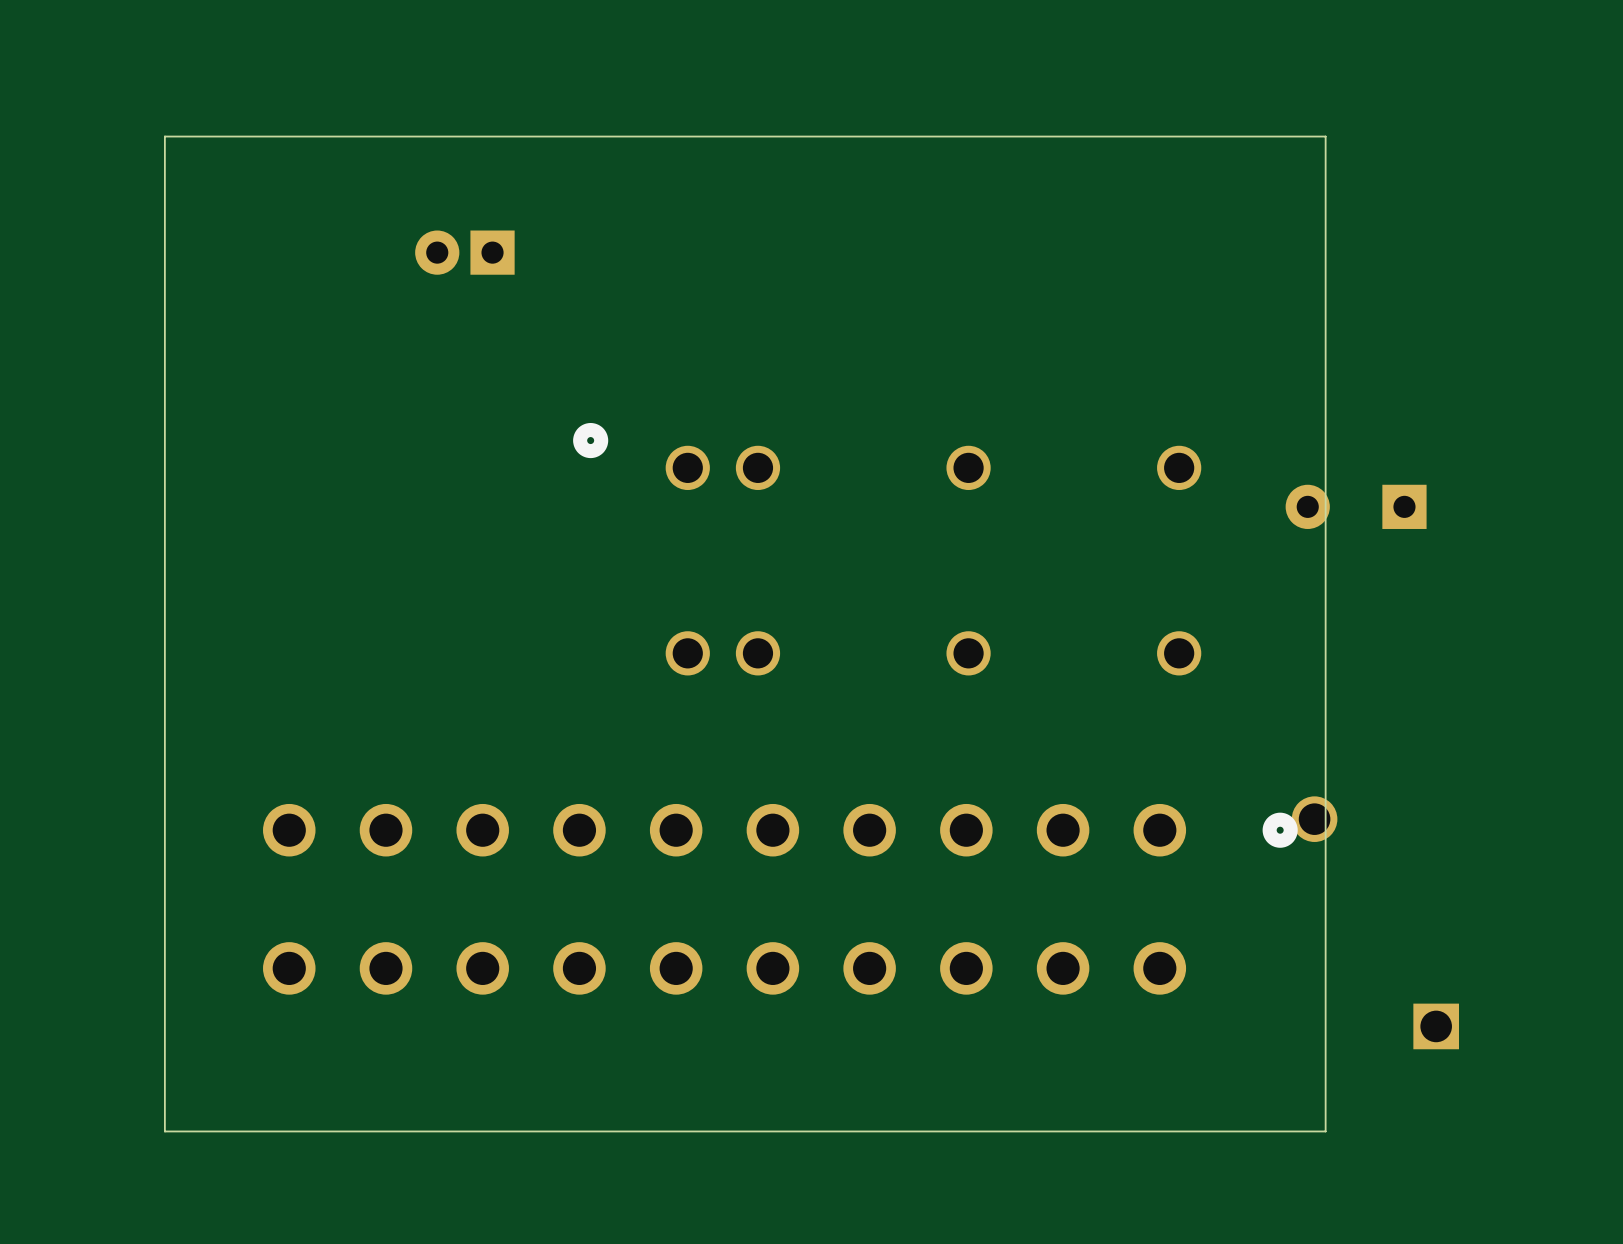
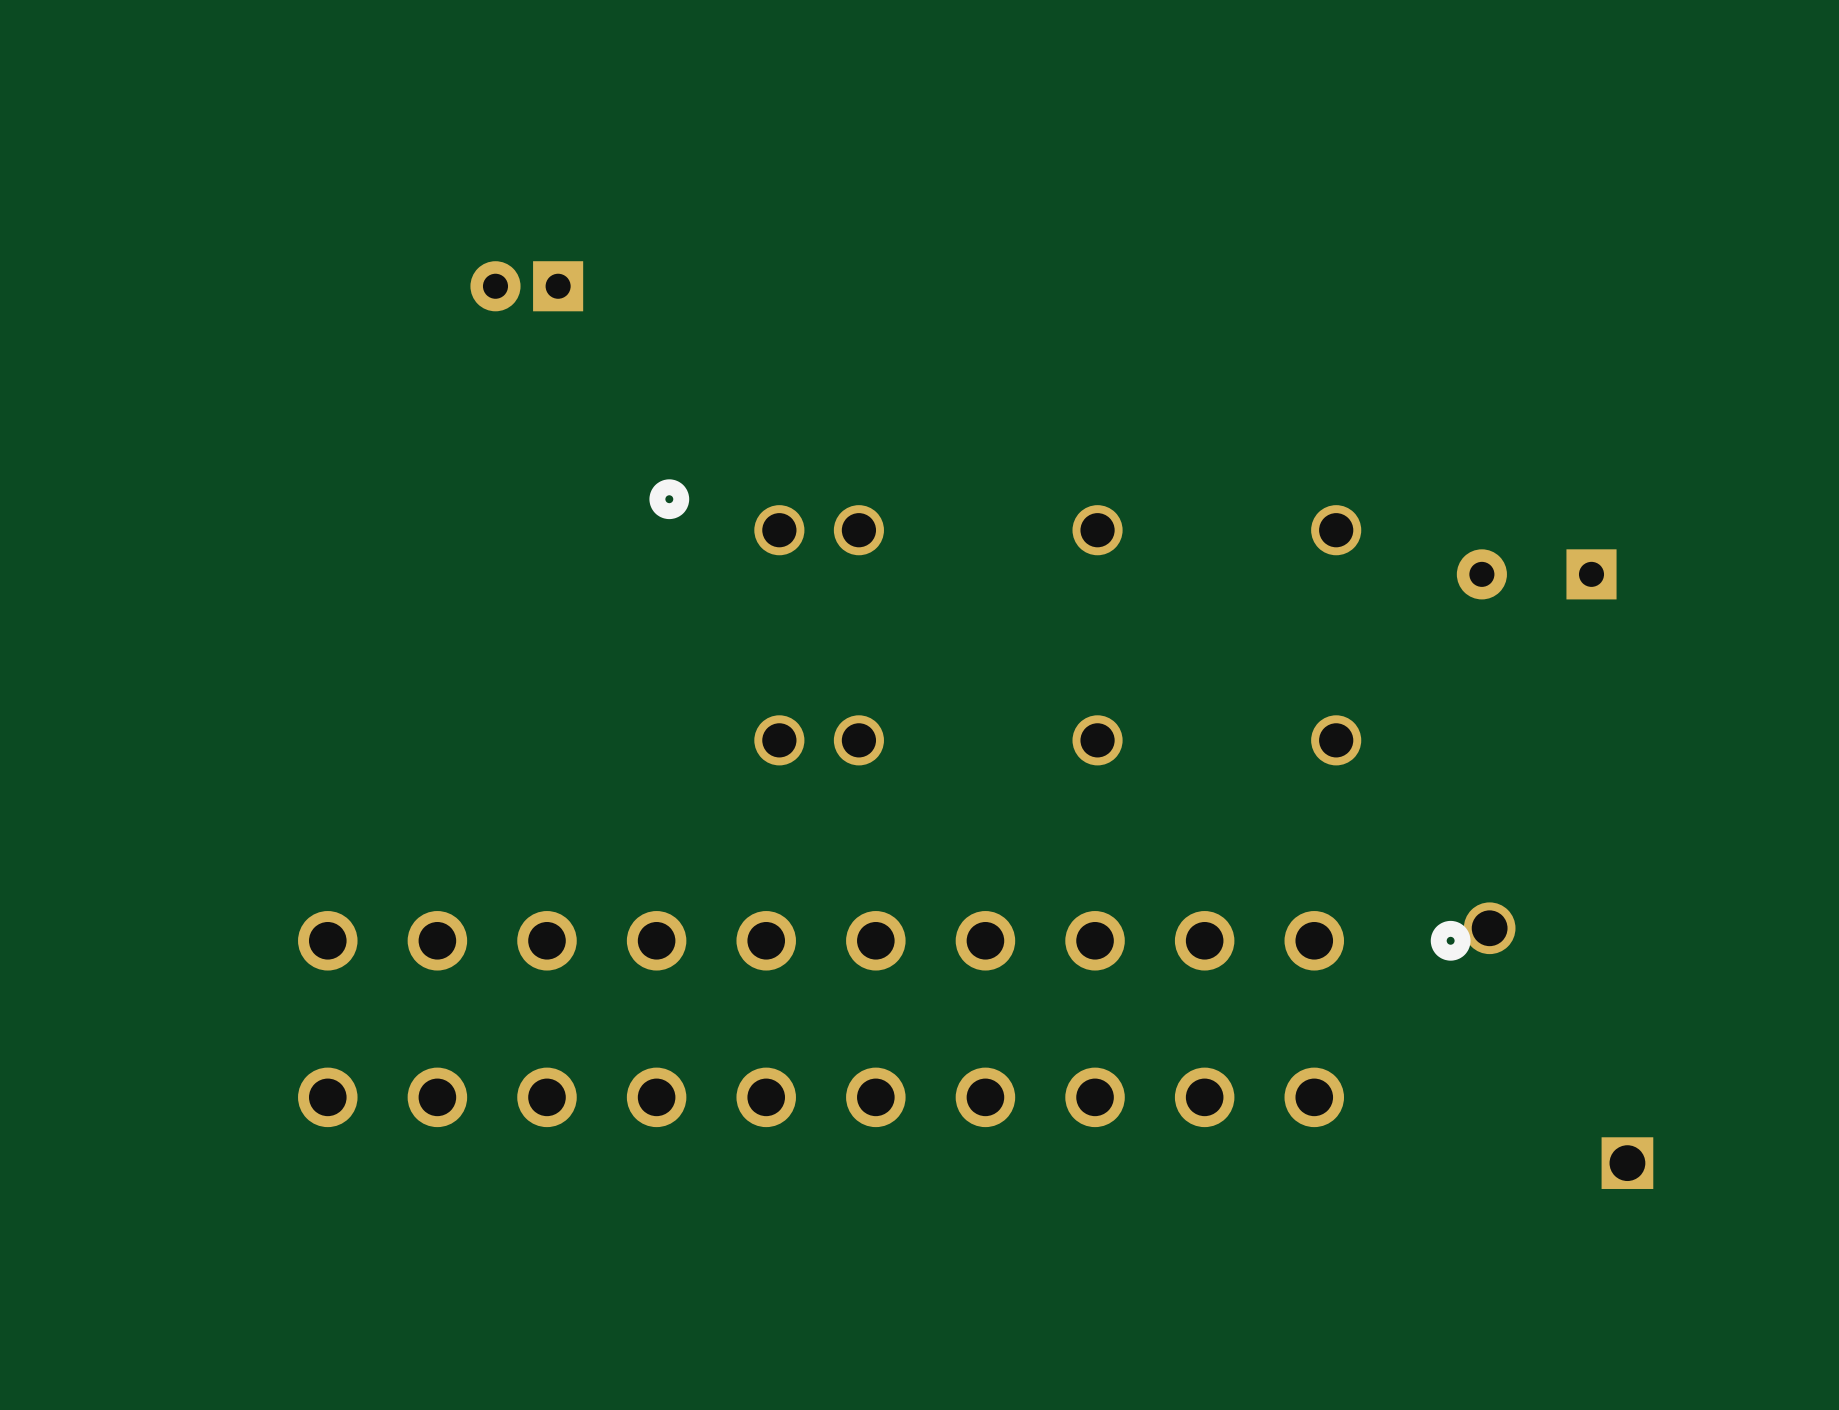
board edge: (1325, 136) (164, 136) (164, 1131) (1325, 1131) (1325, 136) -> none

